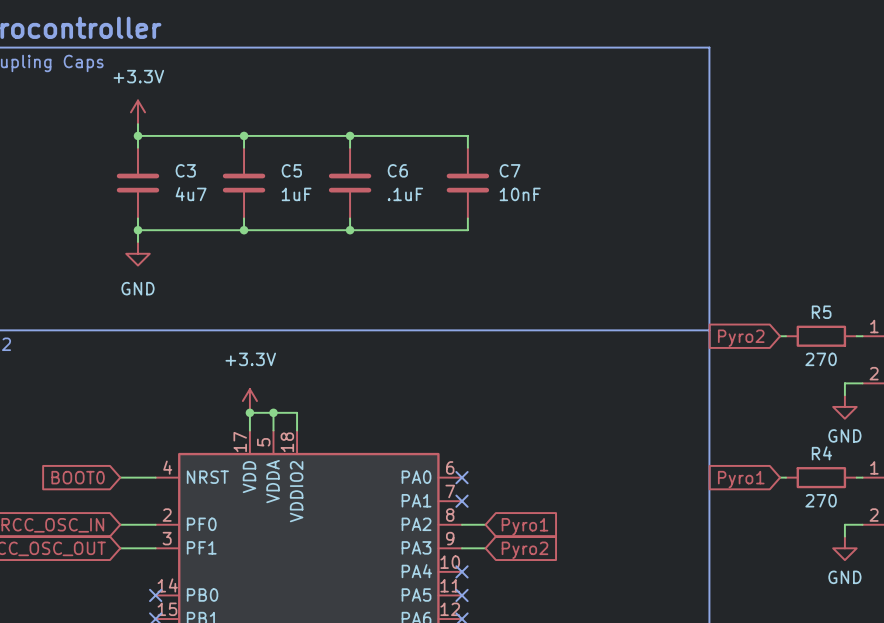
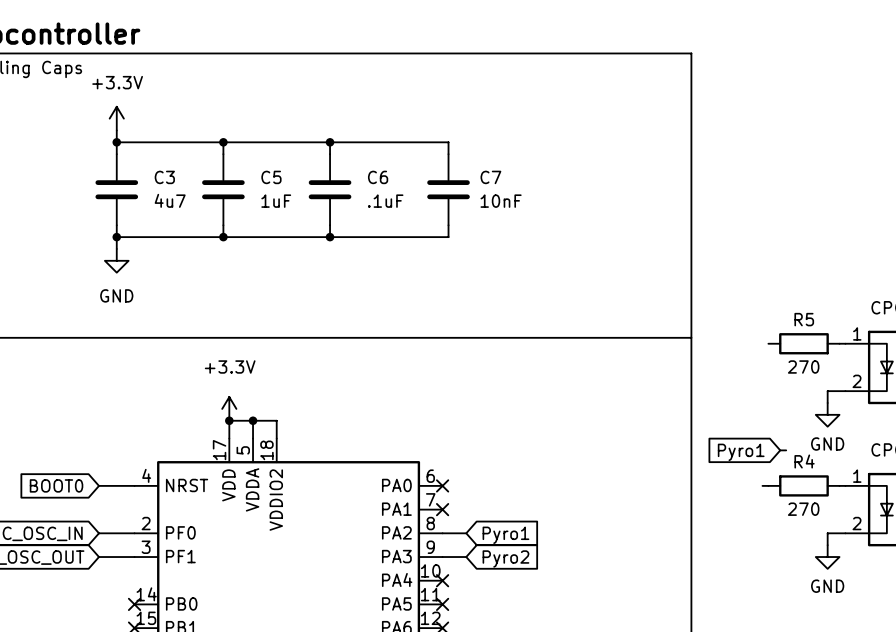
wire: (780, 336) (786, 336) -> (780, 450) (786, 450)
global label: Pyro2 (741, 338) -> none
global label position: Pyro1 (741, 479) -> Pyro1 (741, 452)

